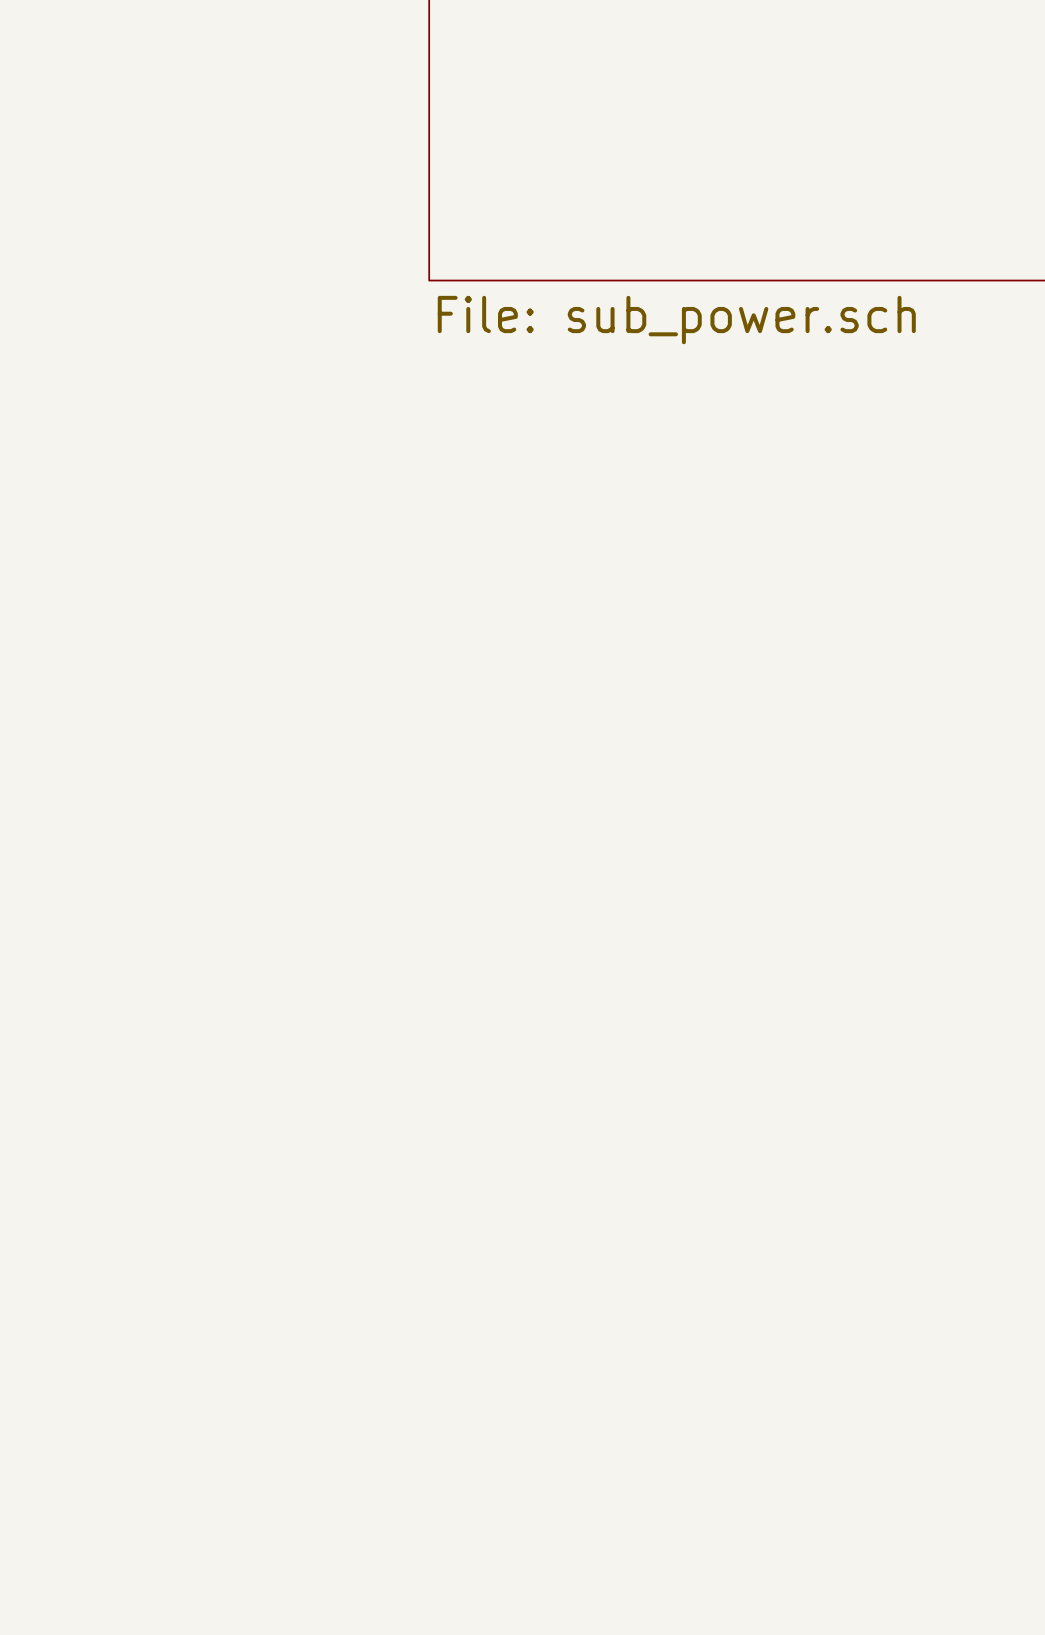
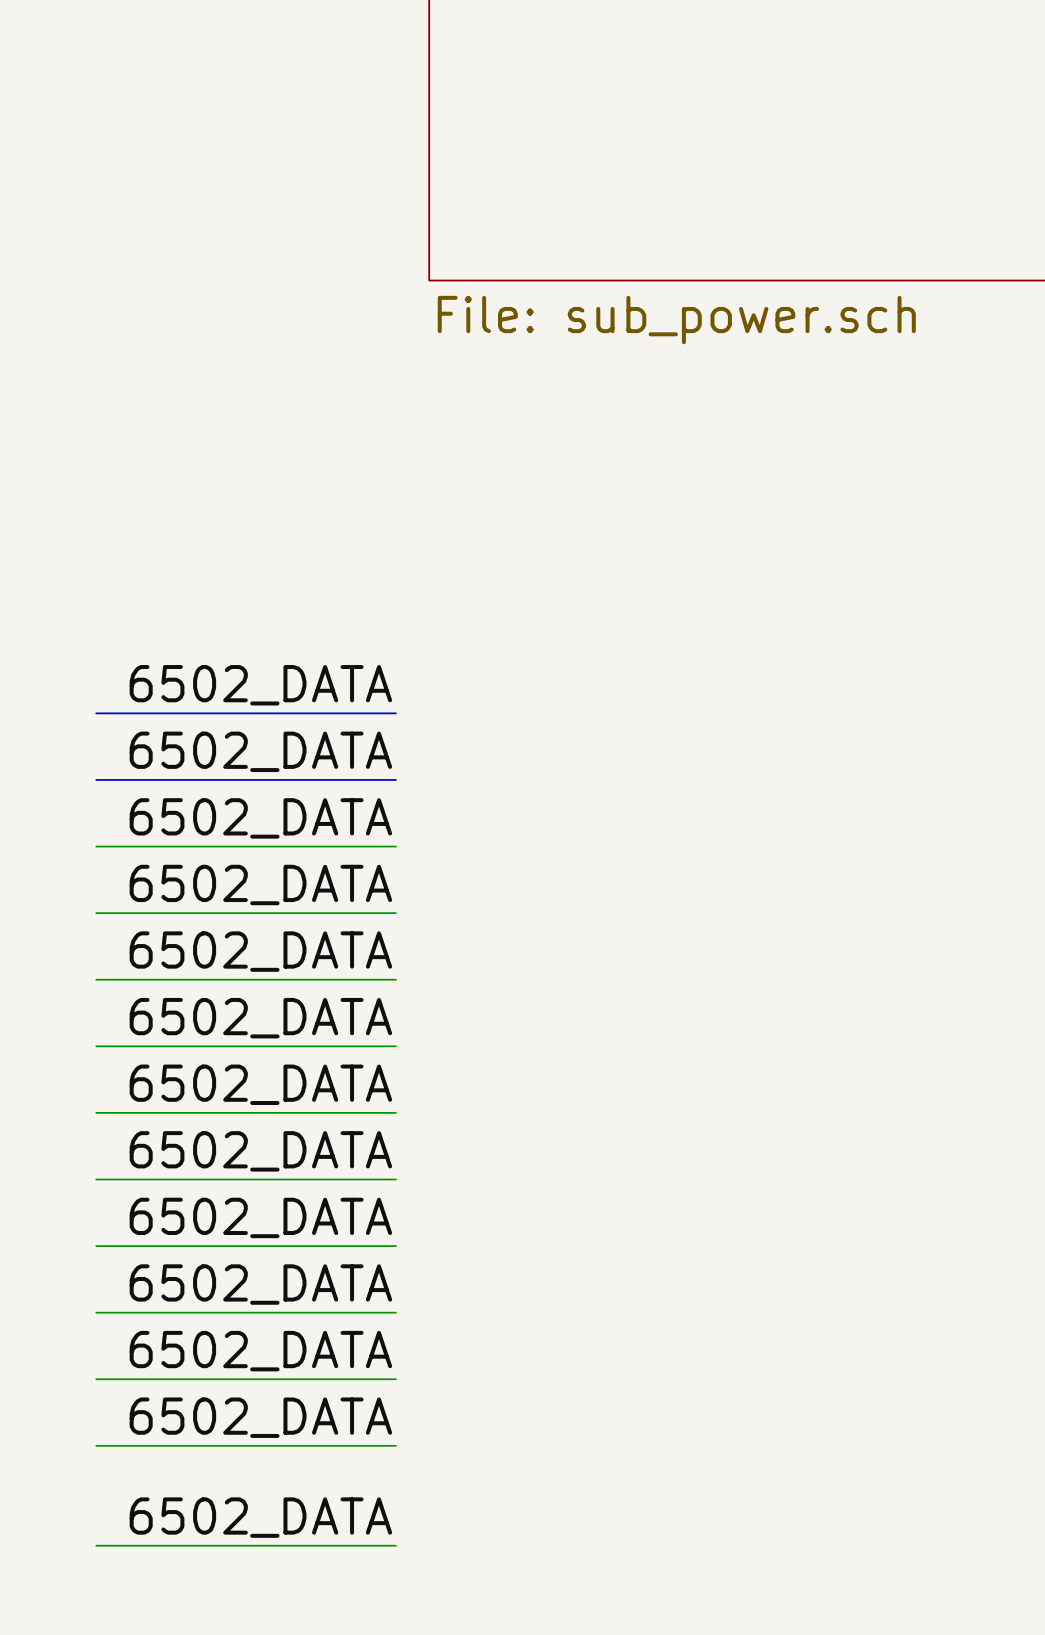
label: none -> 6502_DATA (260, 685)
bus: none -> (96, 713) (395, 713)
label: none -> 6502_DATA (260, 751)
bus: none -> (96, 779) (395, 779)
label: none -> 6502_DATA (260, 818)
wire: none -> (96, 846) (395, 846)
label: none -> 6502_DATA (260, 885)
wire: none -> (96, 913) (395, 913)
label: none -> 6502_DATA (260, 951)
wire: none -> (96, 979) (395, 979)
label: none -> 6502_DATA (260, 1018)
wire: none -> (96, 1046) (395, 1046)
label: none -> 6502_DATA (260, 1084)
wire: none -> (96, 1112) (395, 1112)
label: none -> 6502_DATA (260, 1151)
wire: none -> (96, 1179) (395, 1179)
label: none -> 6502_DATA (260, 1217)
wire: none -> (96, 1246) (395, 1246)
label: none -> 6502_DATA (260, 1284)
wire: none -> (96, 1312) (395, 1312)
label: none -> 6502_DATA (260, 1351)
wire: none -> (96, 1379) (395, 1379)
label: none -> 6502_DATA (260, 1417)
wire: none -> (96, 1445) (395, 1445)
label: none -> 6502_DATA (260, 1517)
wire: none -> (96, 1545) (395, 1545)

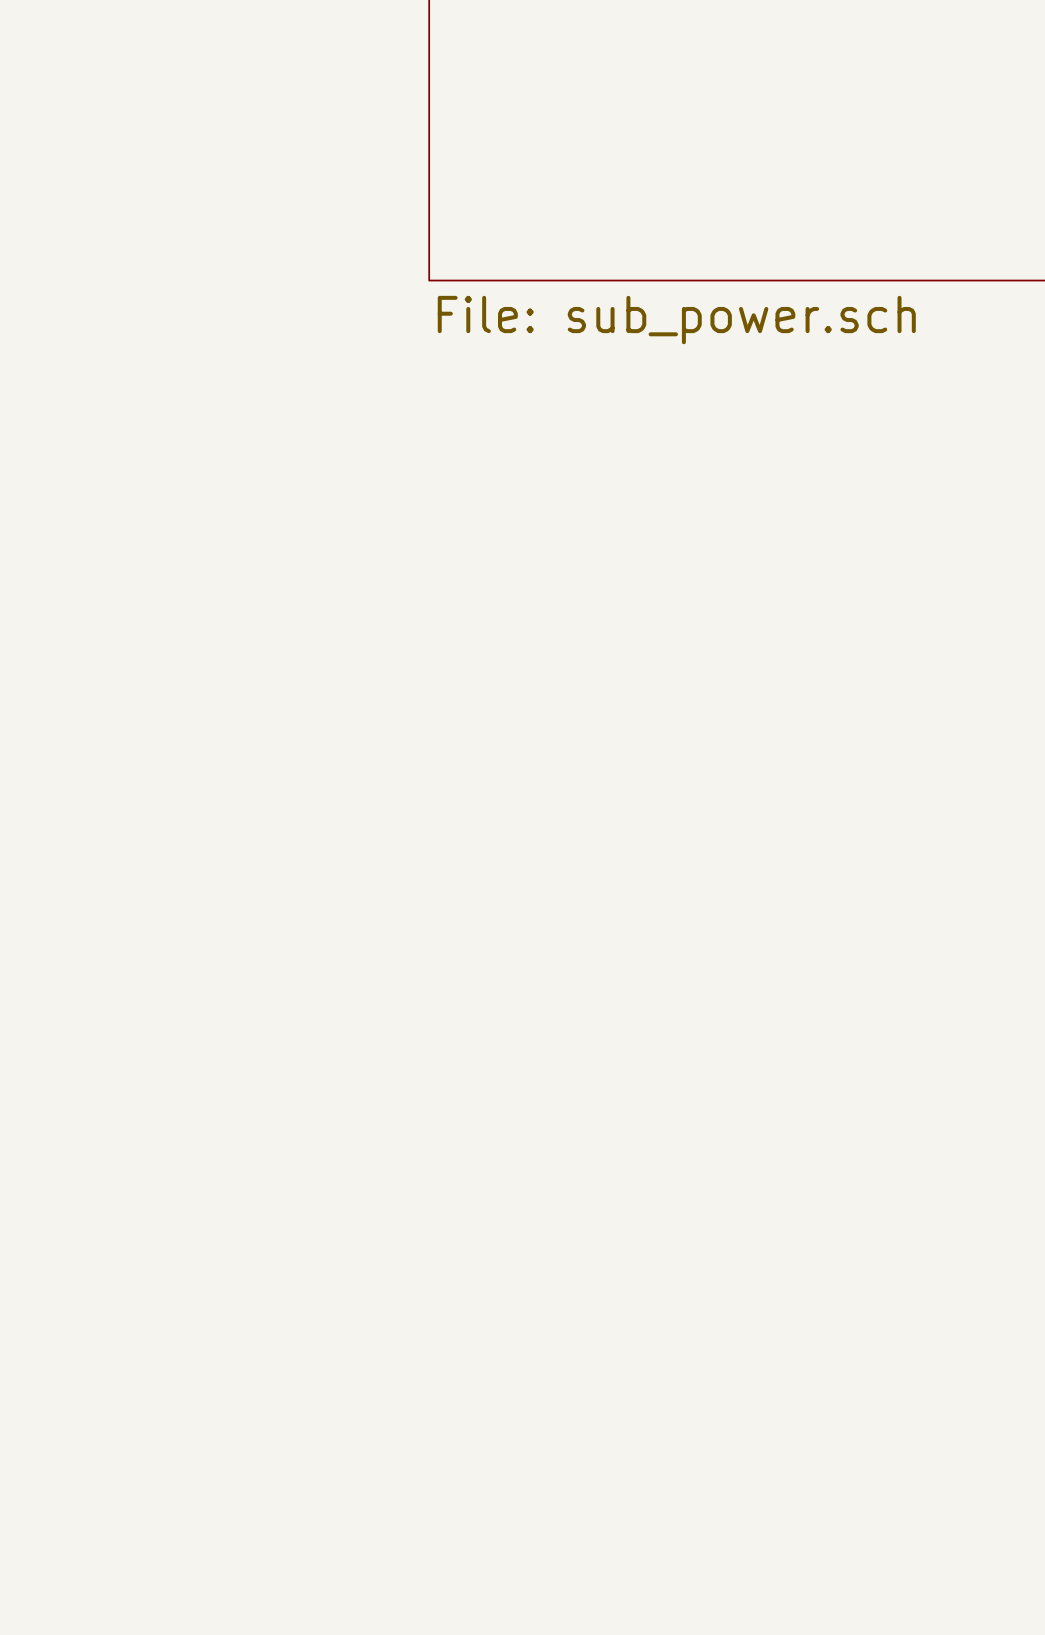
label: 6502_DATA (260, 685) -> none
bus: (96, 713) (395, 713) -> none
label: 6502_DATA (260, 751) -> none
bus: (96, 779) (395, 779) -> none
label: 6502_DATA (260, 818) -> none
wire: (96, 846) (395, 846) -> none
label: 6502_DATA (260, 885) -> none
wire: (96, 913) (395, 913) -> none
label: 6502_DATA (260, 951) -> none
wire: (96, 979) (395, 979) -> none
label: 6502_DATA (260, 1018) -> none
wire: (96, 1046) (395, 1046) -> none
label: 6502_DATA (260, 1084) -> none
wire: (96, 1112) (395, 1112) -> none
label: 6502_DATA (260, 1151) -> none
wire: (96, 1179) (395, 1179) -> none
label: 6502_DATA (260, 1217) -> none
wire: (96, 1246) (395, 1246) -> none
label: 6502_DATA (260, 1284) -> none
wire: (96, 1312) (395, 1312) -> none
label: 6502_DATA (260, 1351) -> none
wire: (96, 1379) (395, 1379) -> none
label: 6502_DATA (260, 1417) -> none
wire: (96, 1445) (395, 1445) -> none
label: 6502_DATA (260, 1517) -> none
wire: (96, 1545) (395, 1545) -> none

